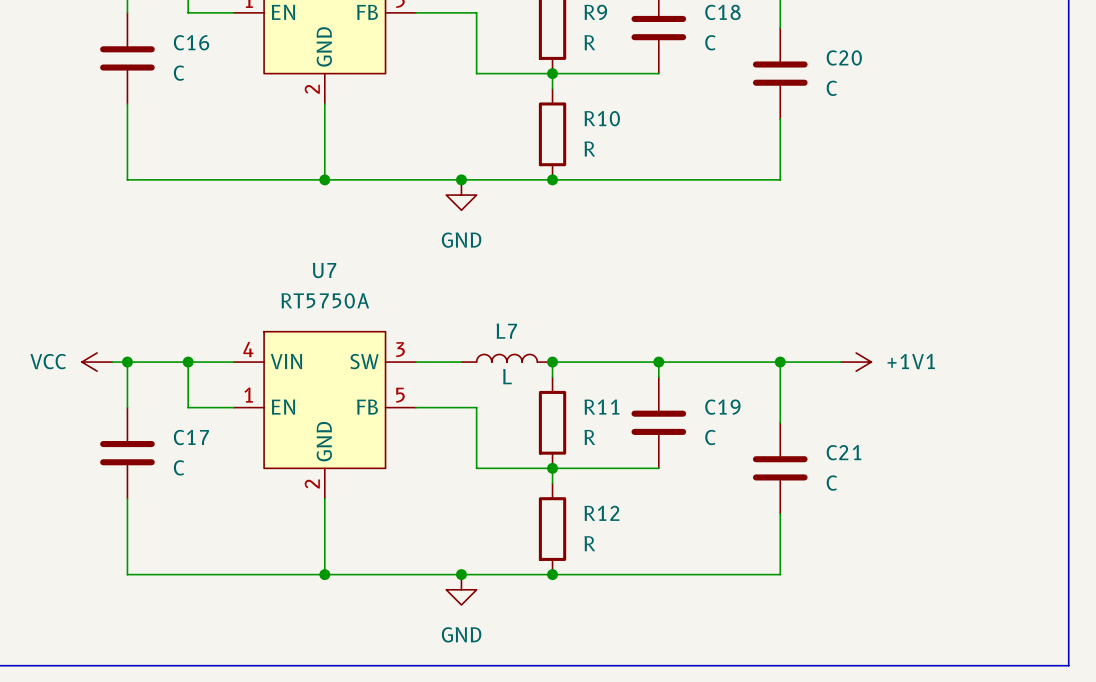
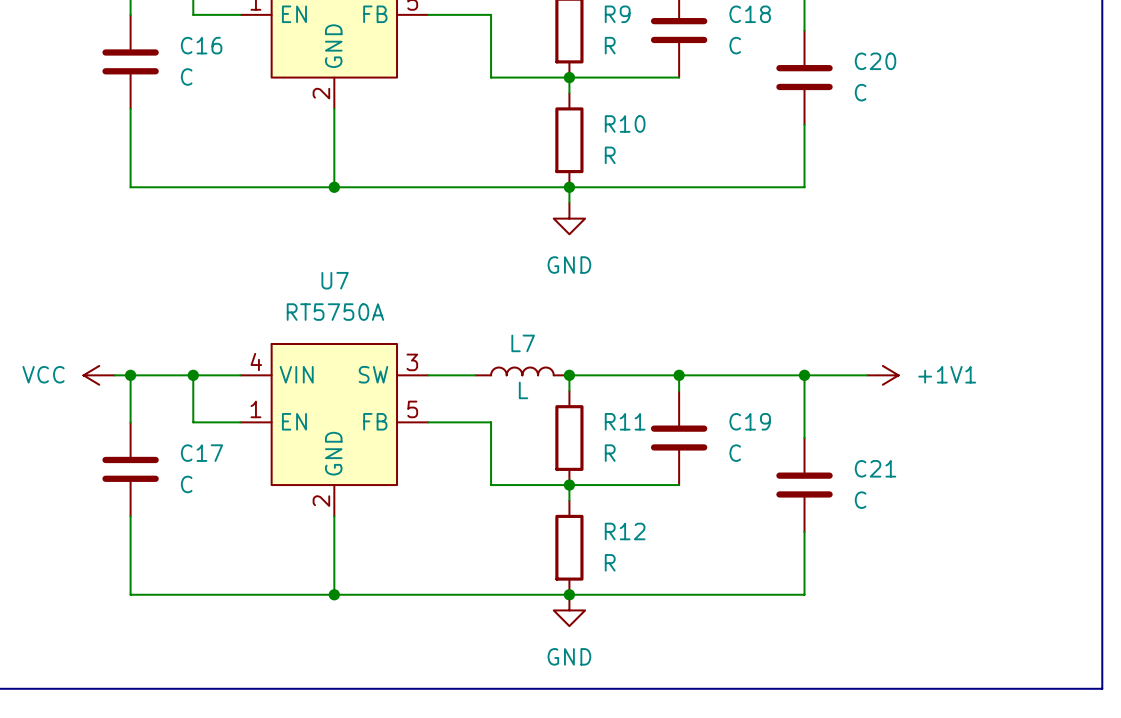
junction: (461, 179) -> none
wire: none -> (569, 187) (569, 202)
power symbol position: GND (461, 195) -> GND (569, 218)
junction: (461, 574) -> none
power symbol position: GND (461, 589) -> GND (569, 610)

